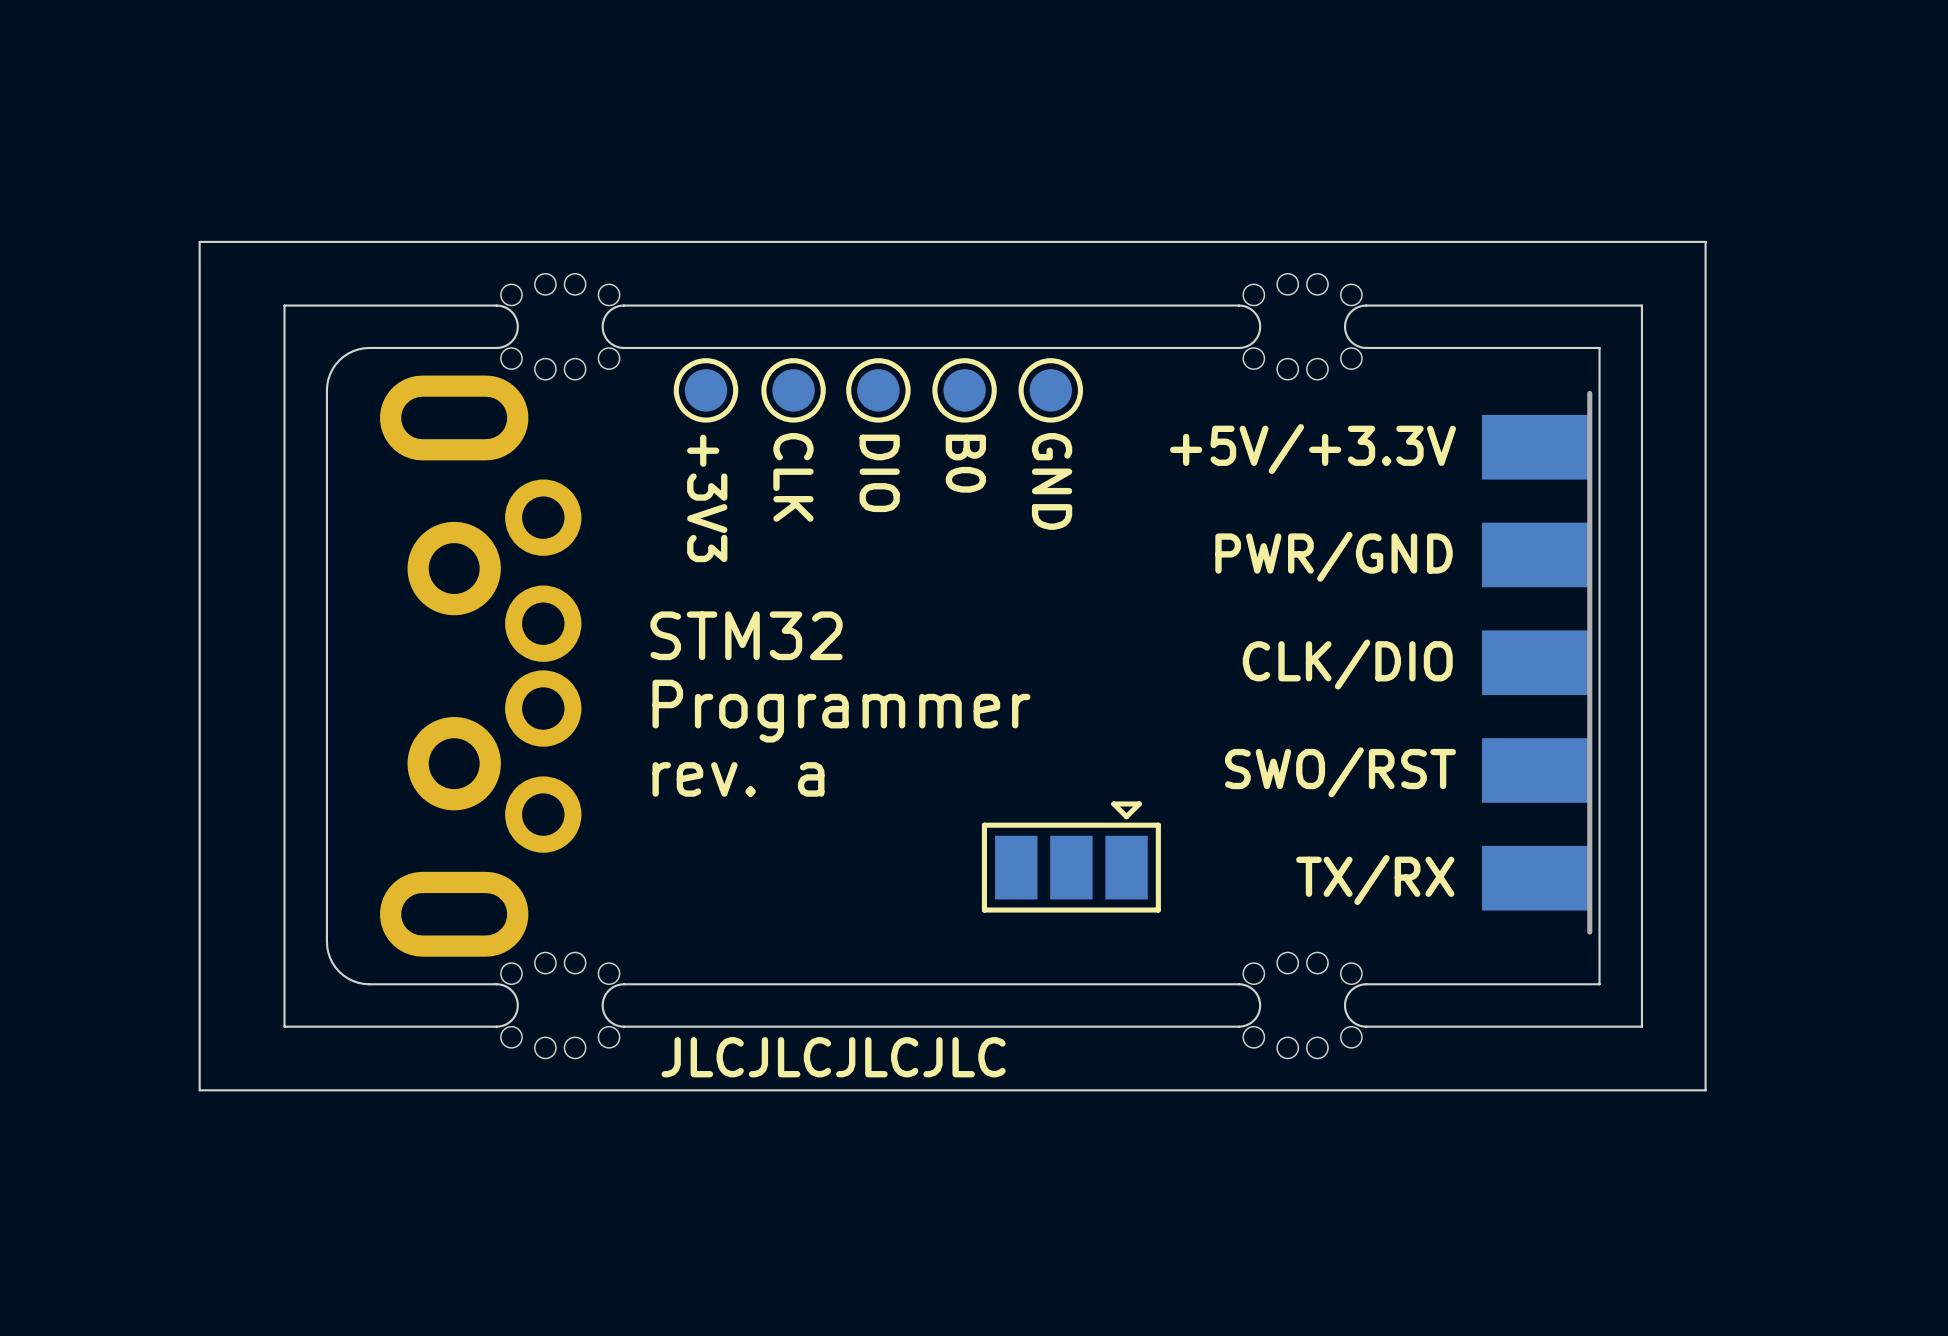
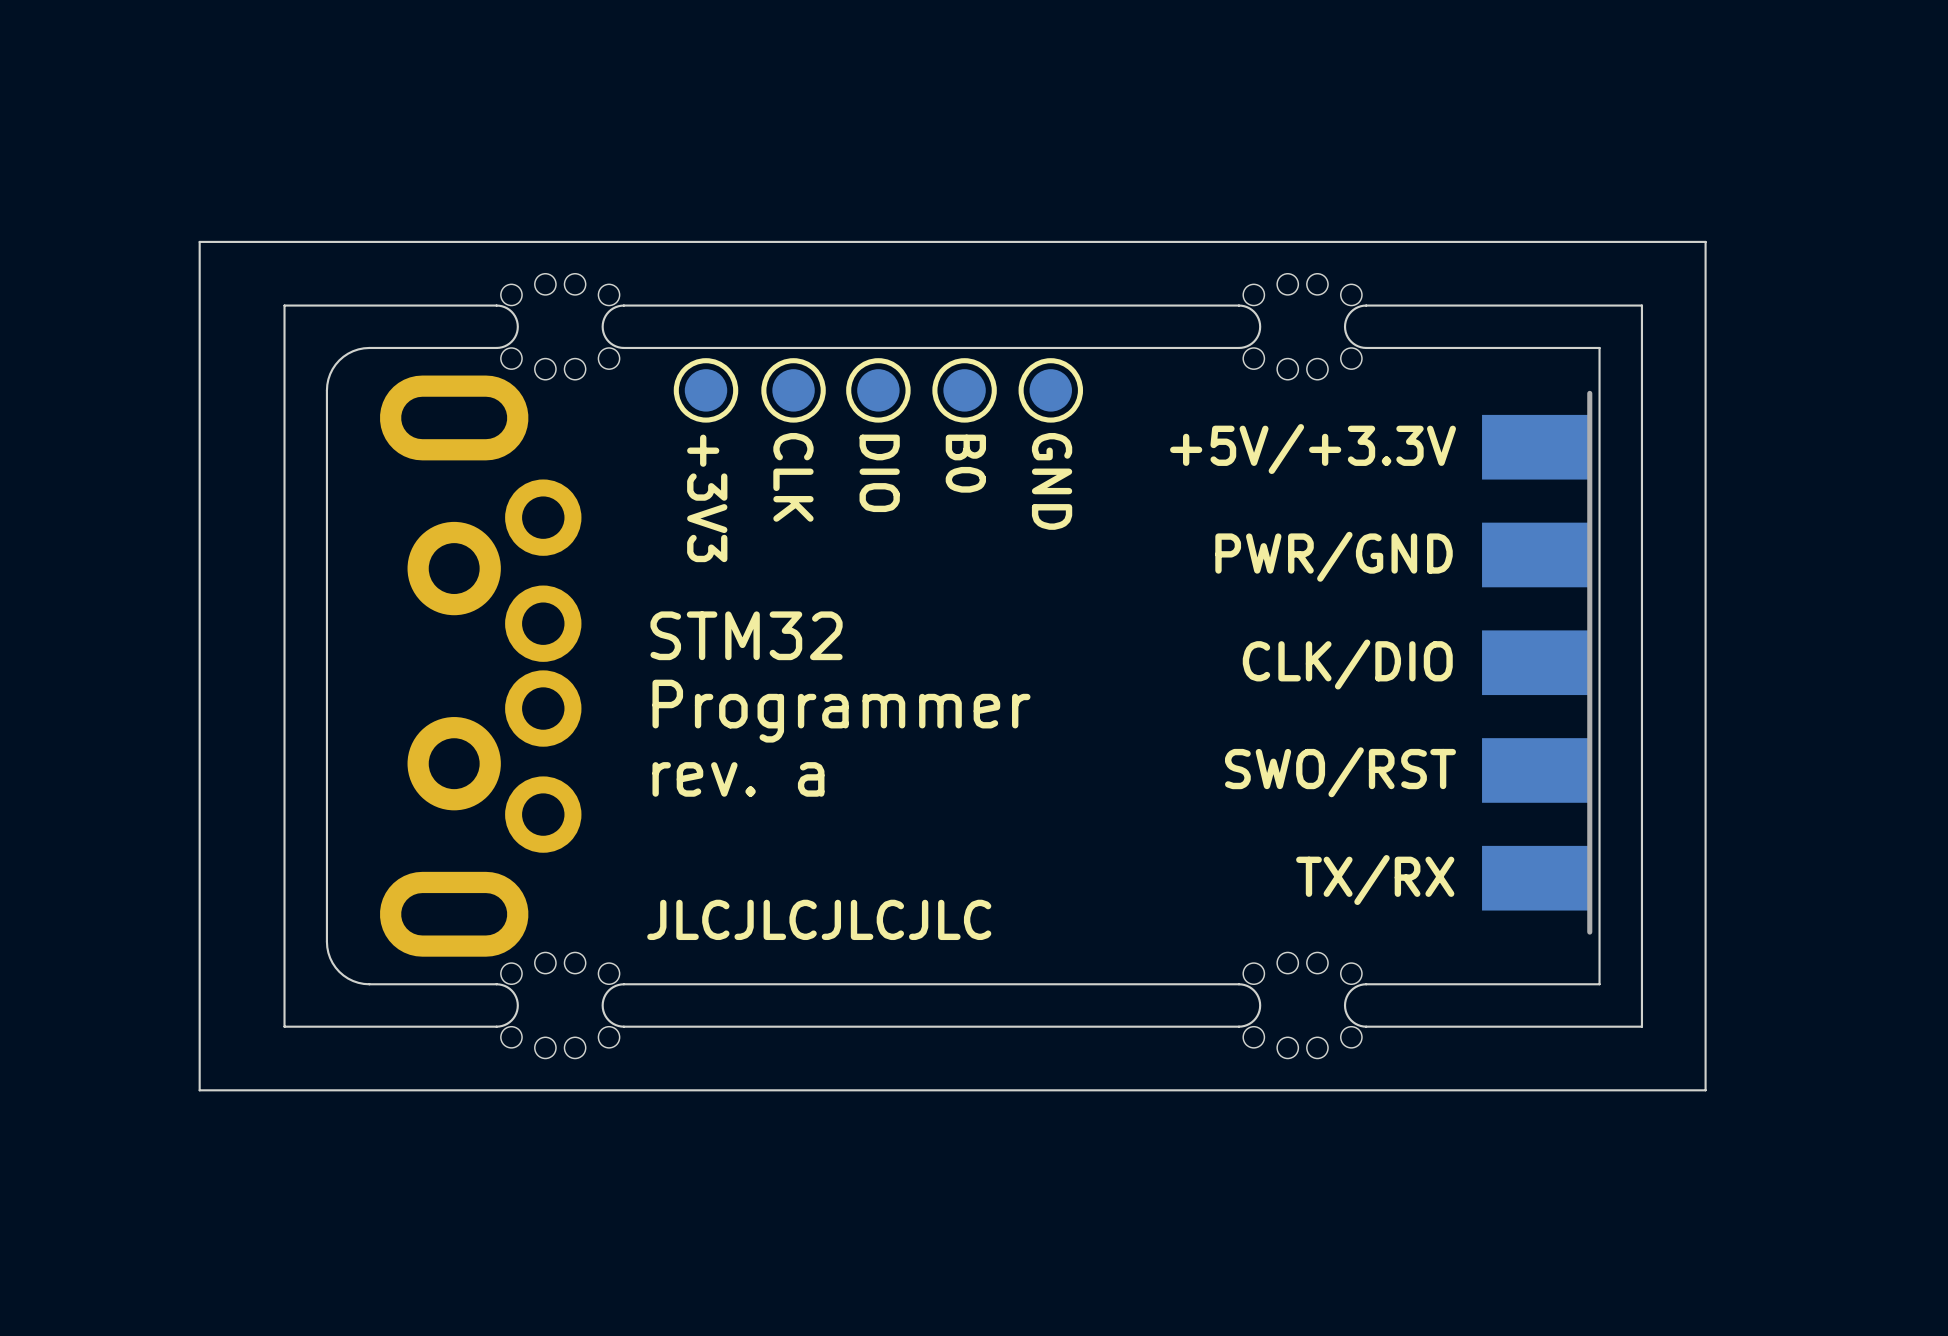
part: (1071, 857) -> none
text position: JLCJLCJLCJLC (833, 1057) -> JLCJLCJLCJLC (819, 919)

